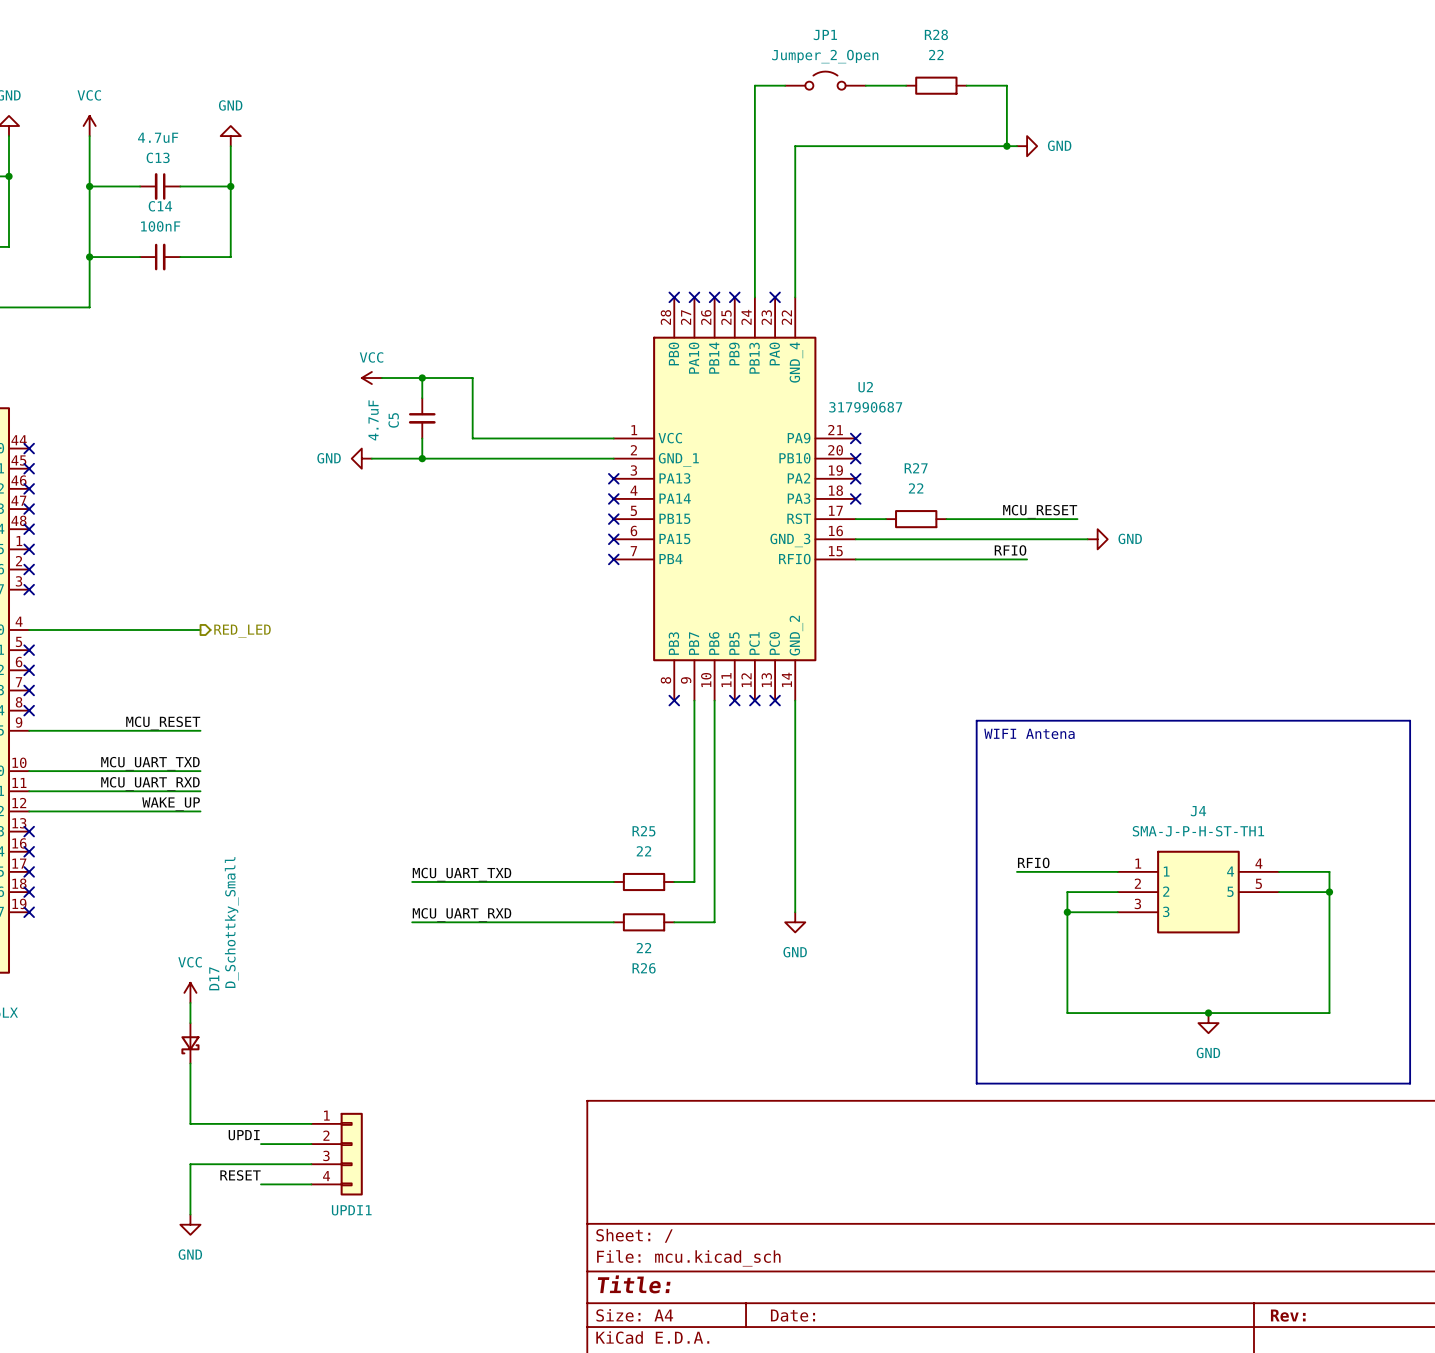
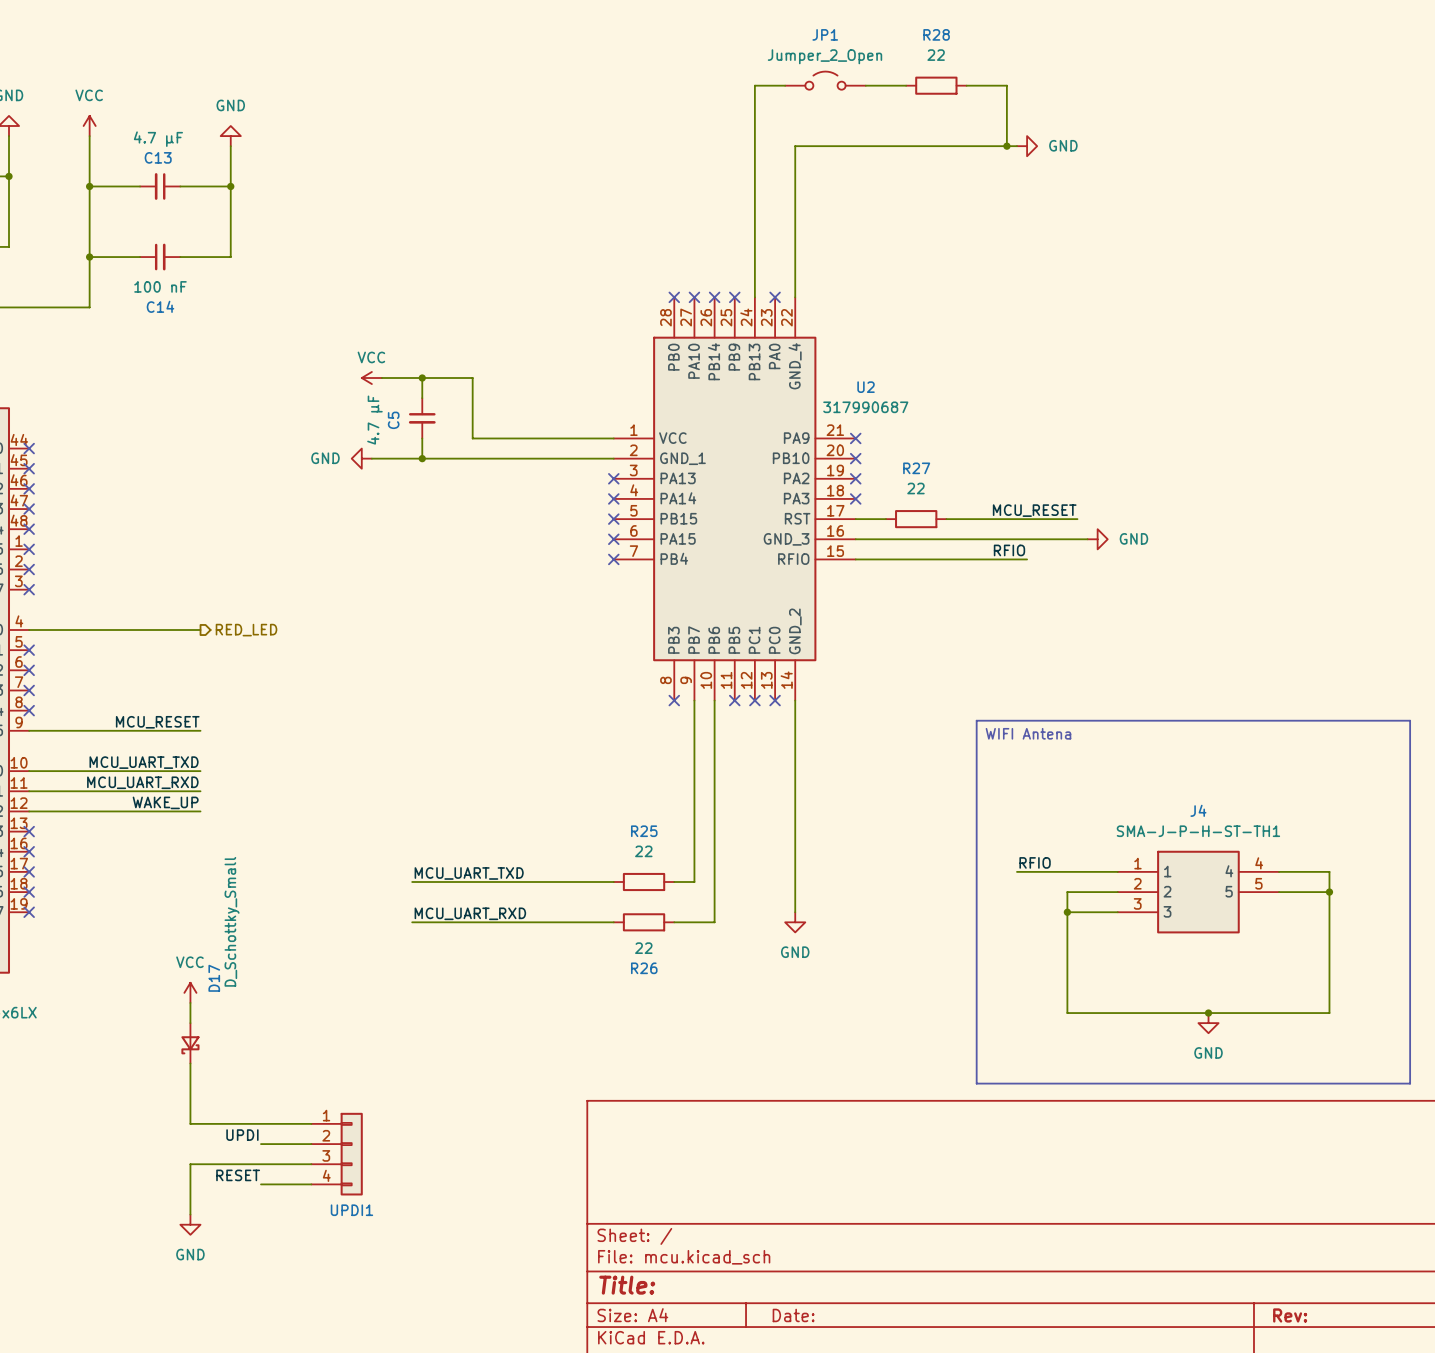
C13 value: 4.7uF (158, 137) -> 4.7 µF (158, 139)
C14 name position: C14 (160, 206) -> C14 (160, 306)
C14 value: 100nF (160, 226) -> 100 nF (160, 286)
C5 value: 4.7uF (373, 420) -> 4.7 µF (374, 420)

